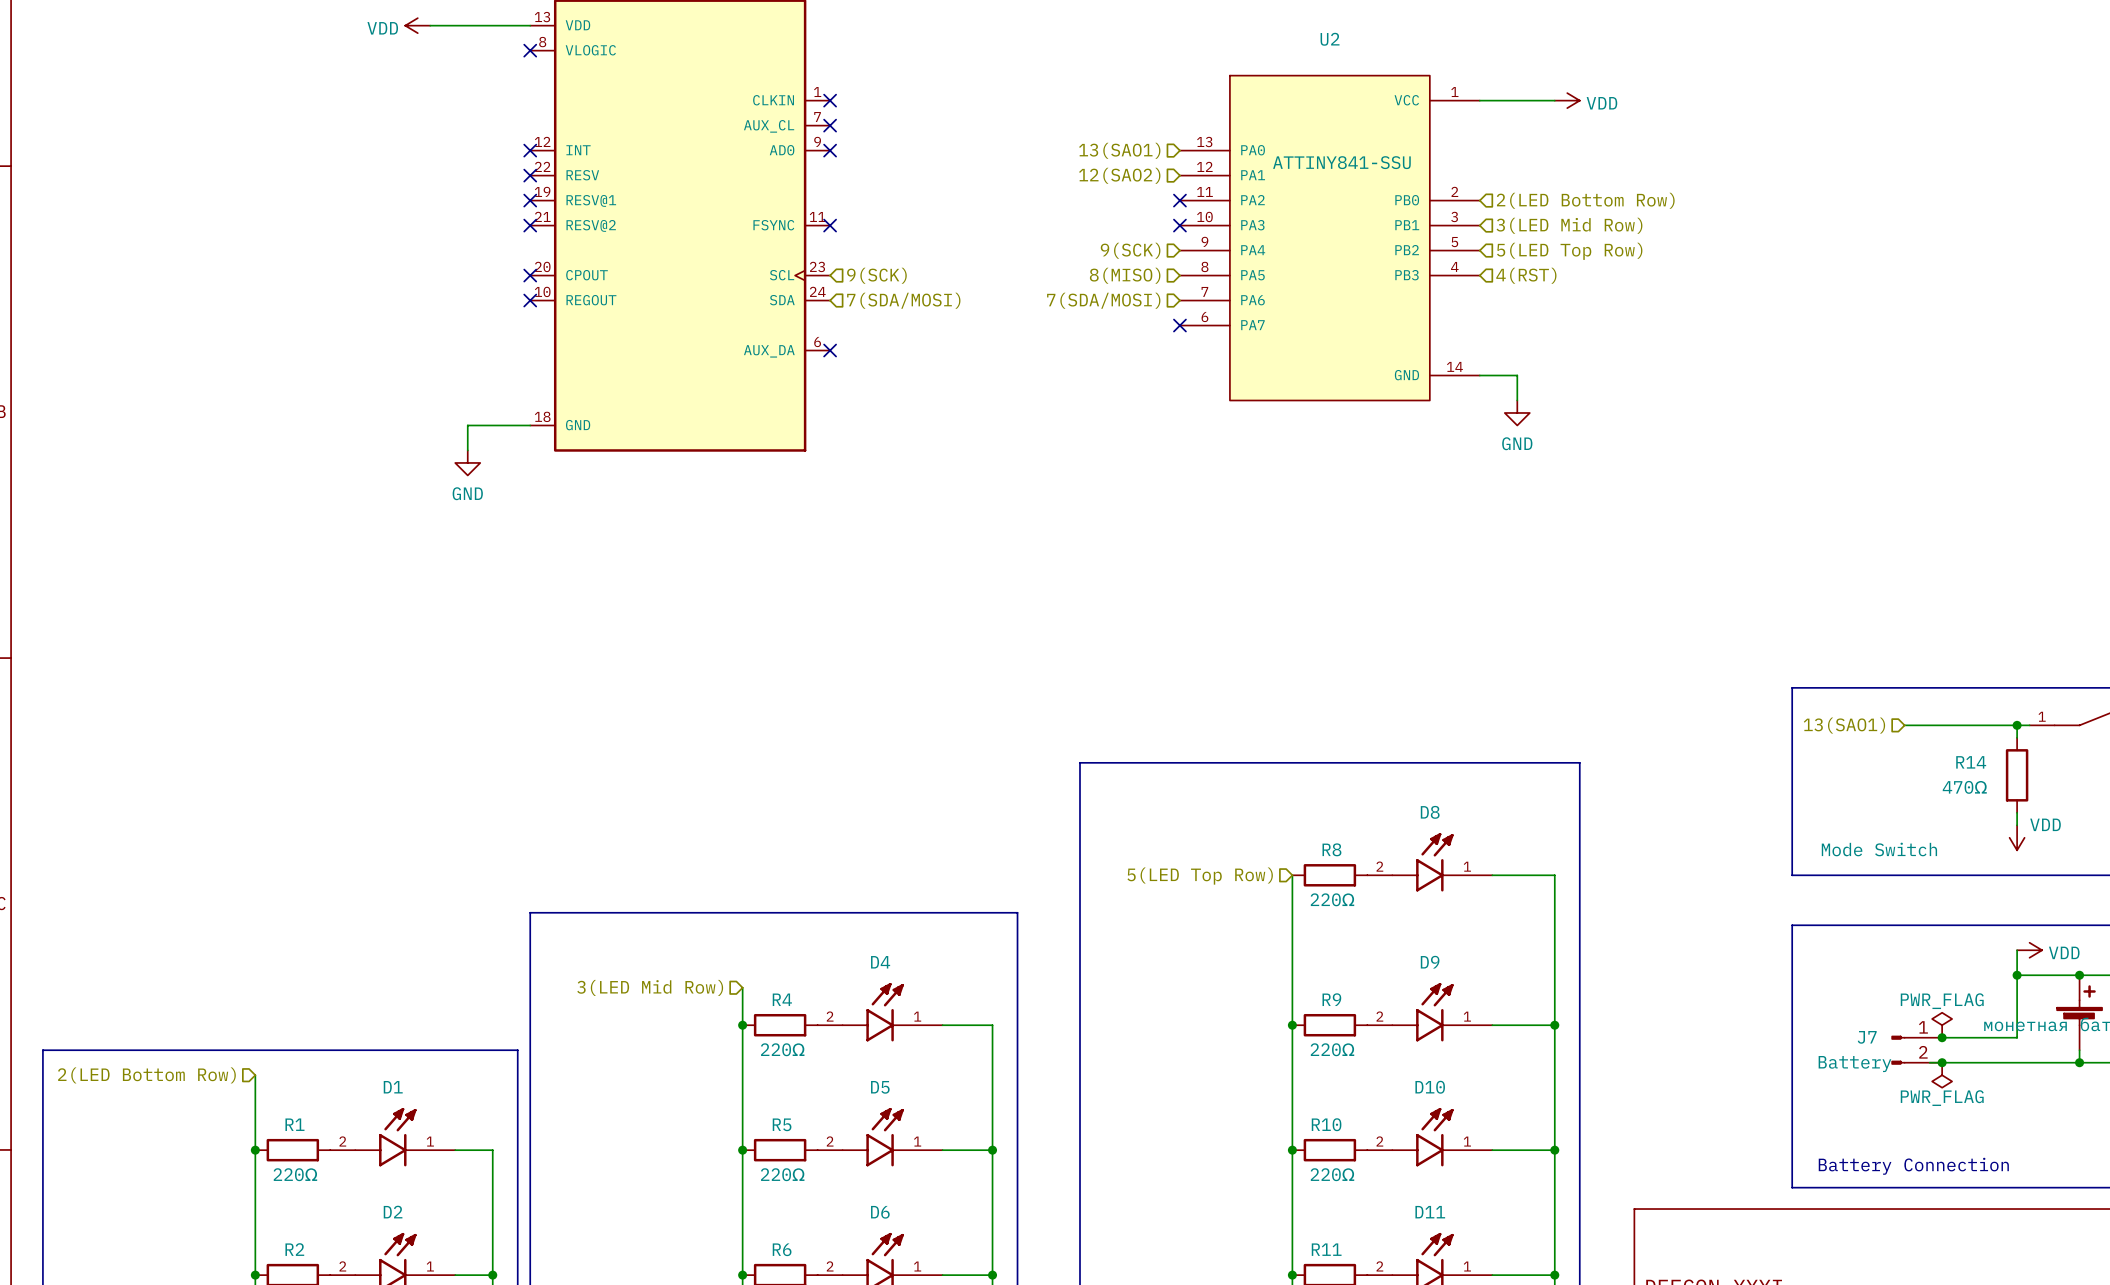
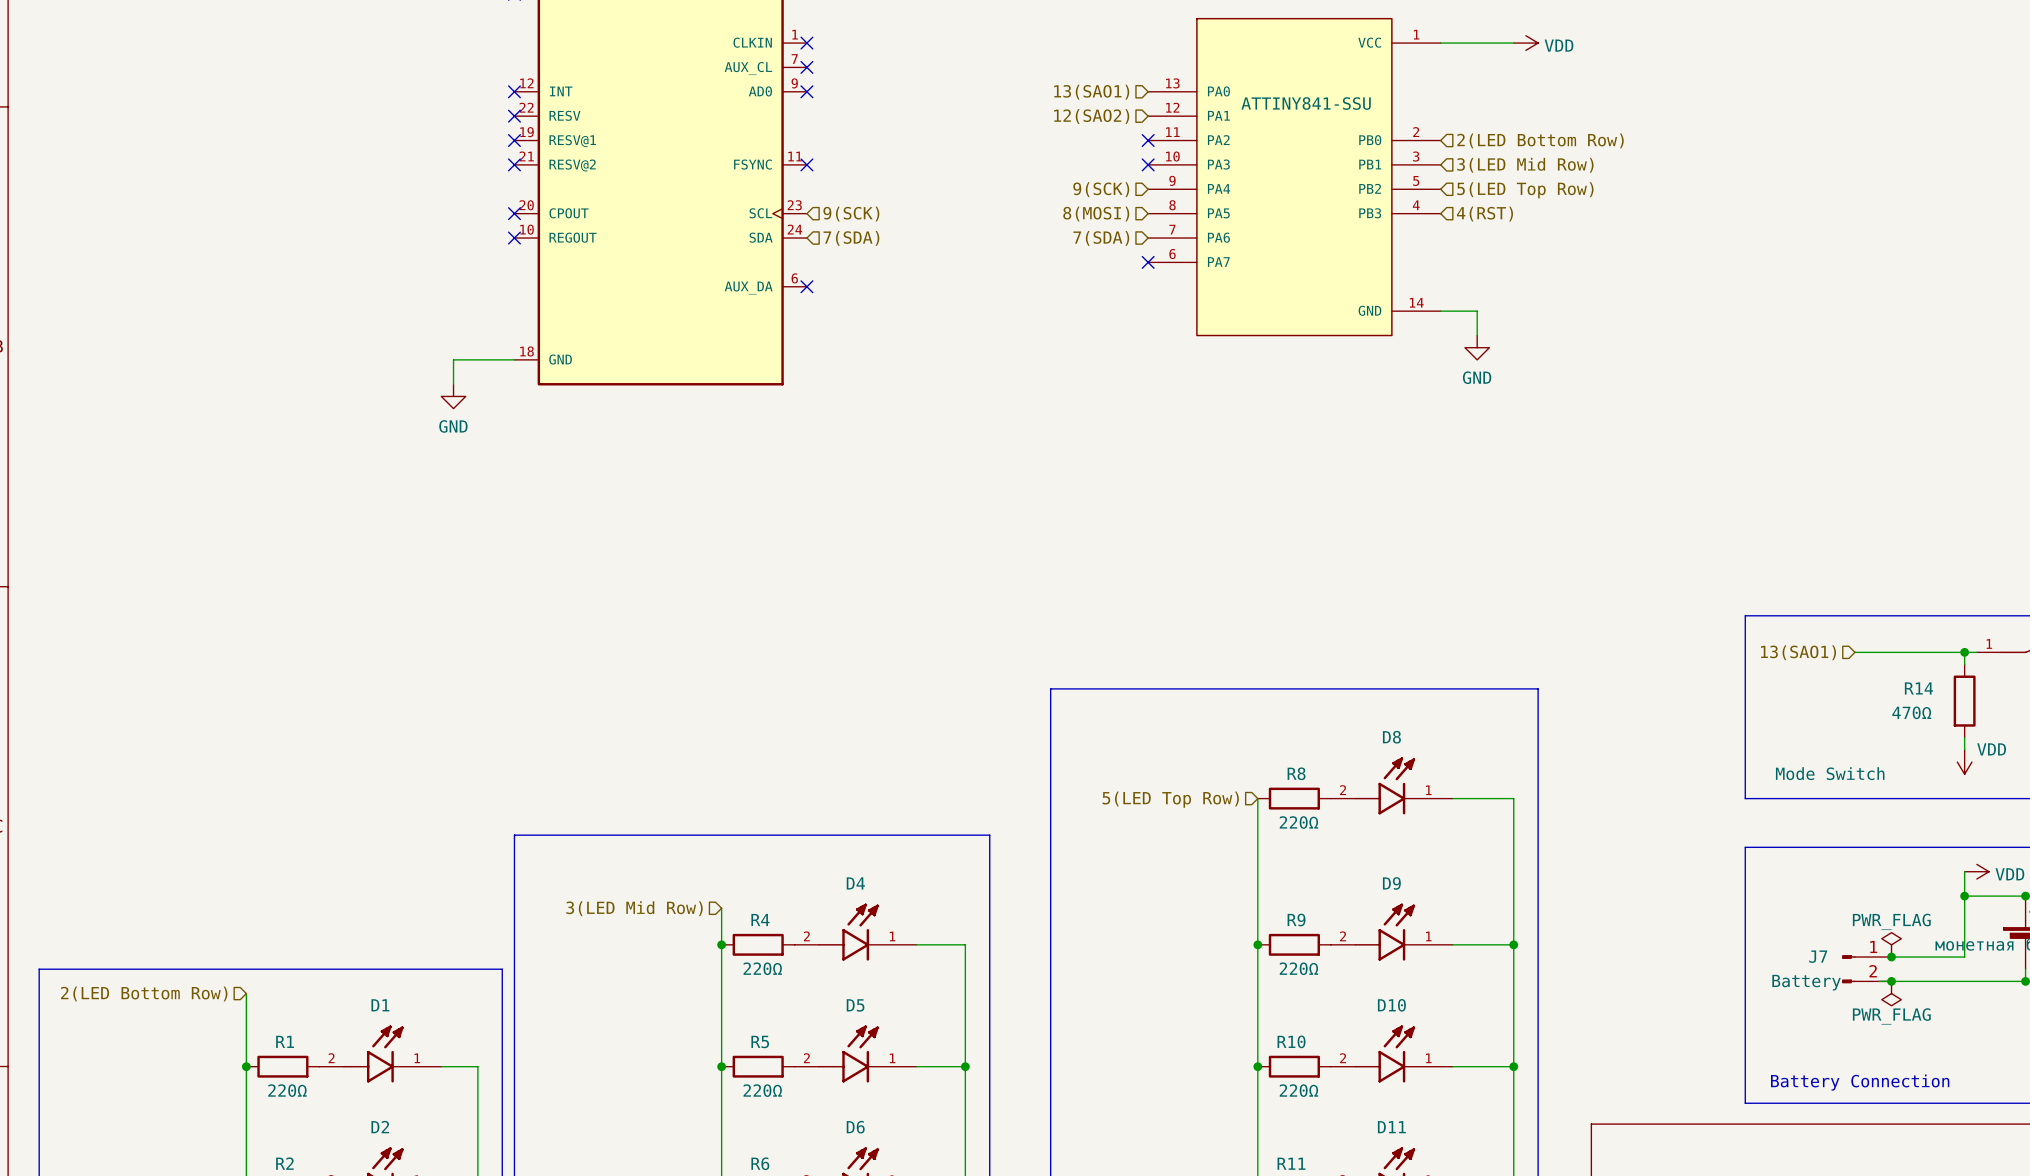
hierarchical label: 8(MISO) (1125, 275) -> 8(MOSI) (1096, 214)
hierarchical label: 7(SDA/MOSI) (903, 300) -> 7(SDA) (851, 238)
hierarchical label: 7(SDA/MOSI) (1103, 300) -> 7(SDA) (1101, 238)

